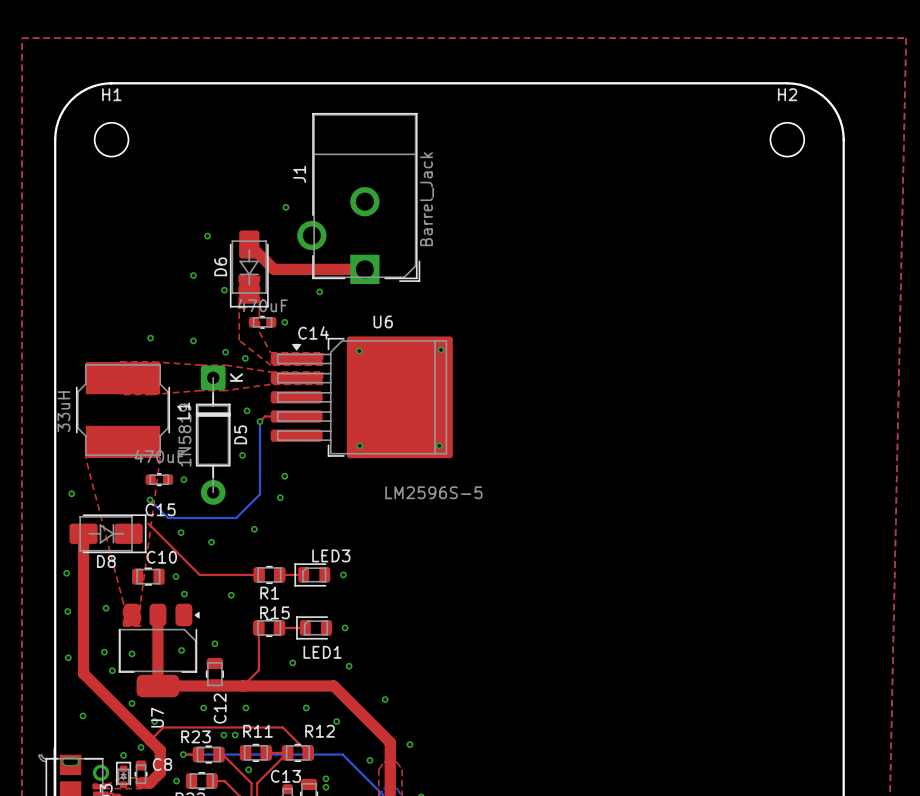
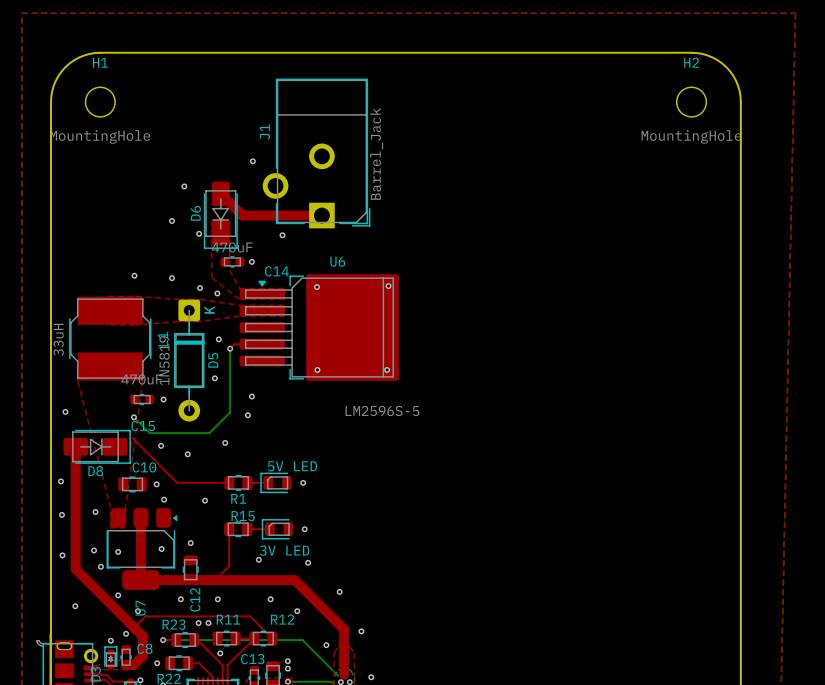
H1 value: none -> MountingHole (100, 136)
H2 value: none -> MountingHole (691, 136)
LED3 name: LED3 (331, 555) -> 5V LED (292, 466)
LED1 name: LED1 (322, 652) -> 3V LED (284, 550)

